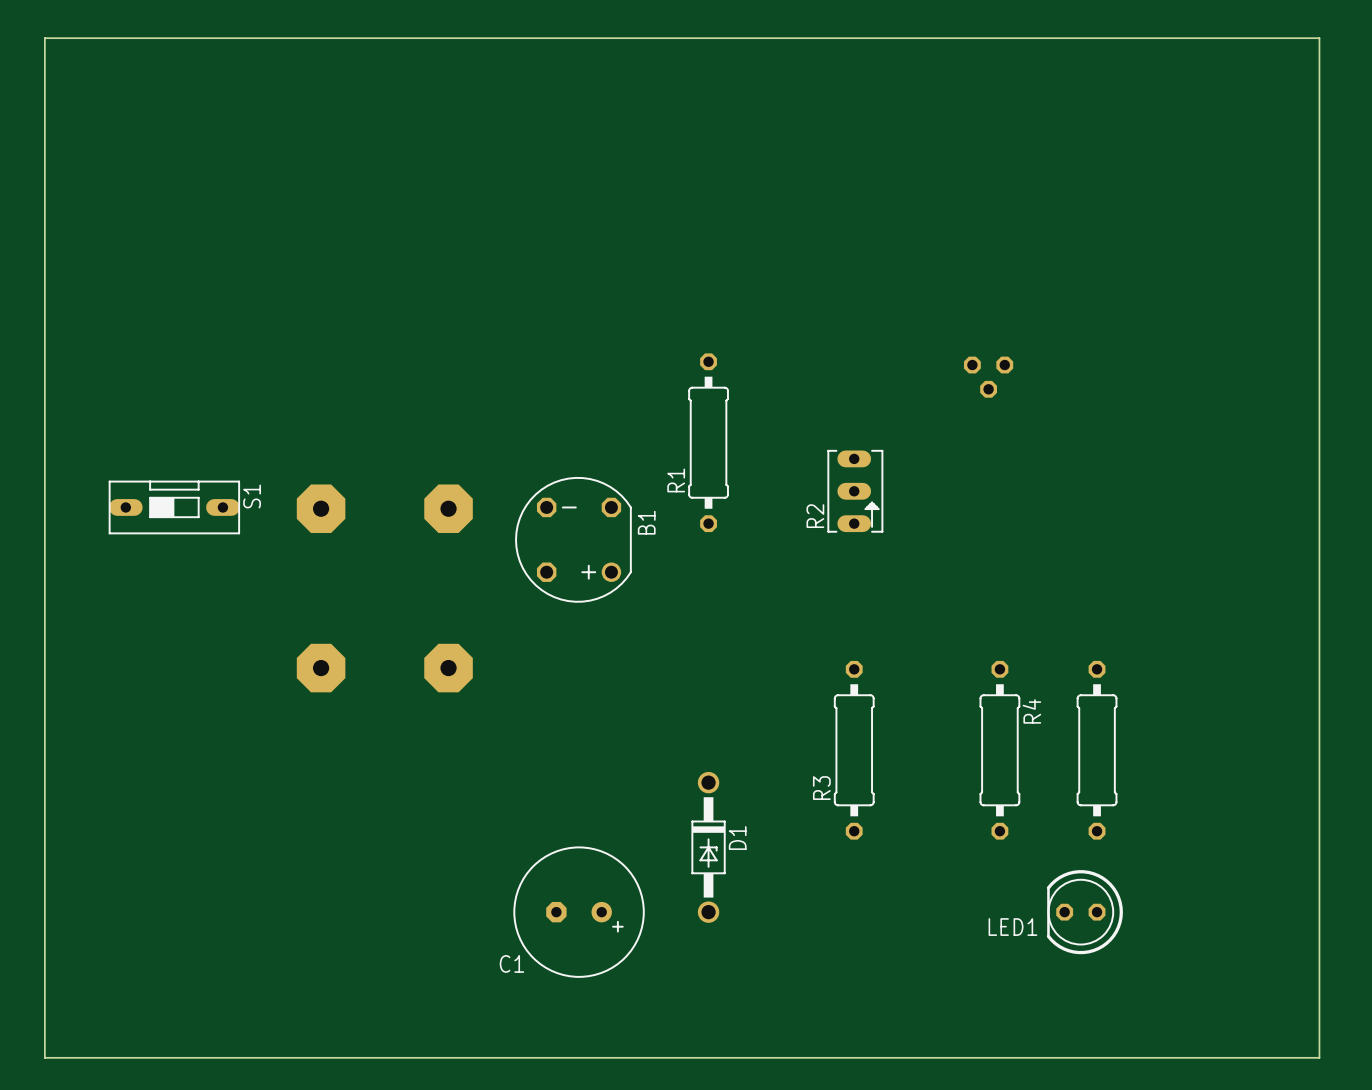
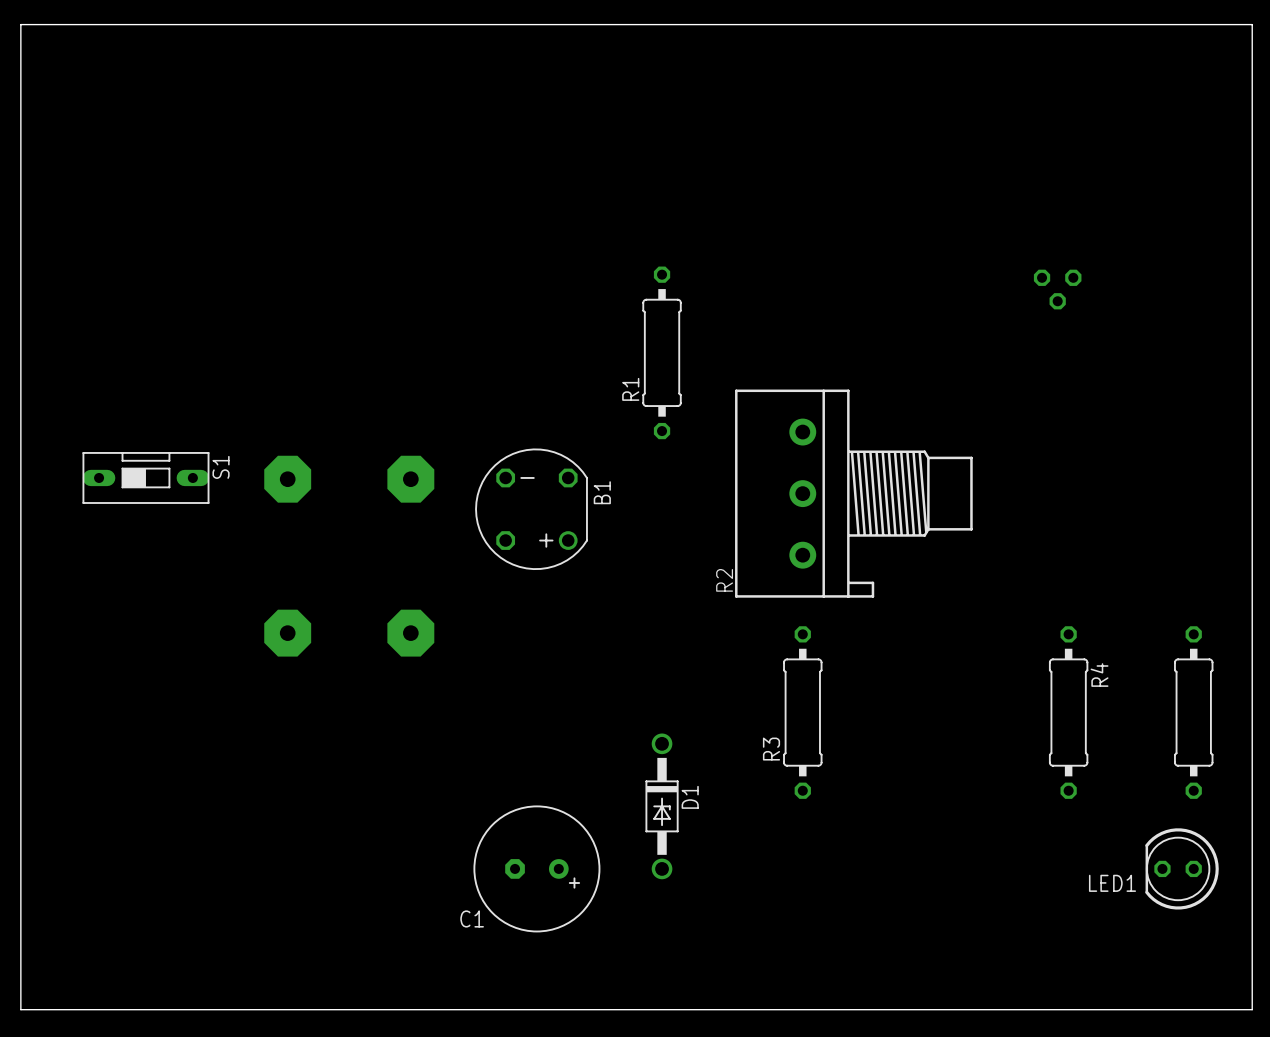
part position: (988, 377) -> (1057, 289)
R1 position: (708, 442) -> (662, 352)
R2 footprint: [827, 449, 884, 533] -> [735, 389, 973, 598]
R2 name position: R2 (815, 516) -> R2 (724, 580)
R4 position: (999, 750) -> (1068, 712)
part position: (1097, 750) -> (1193, 712)
LED1 position: (1084, 912) -> (1182, 868)

